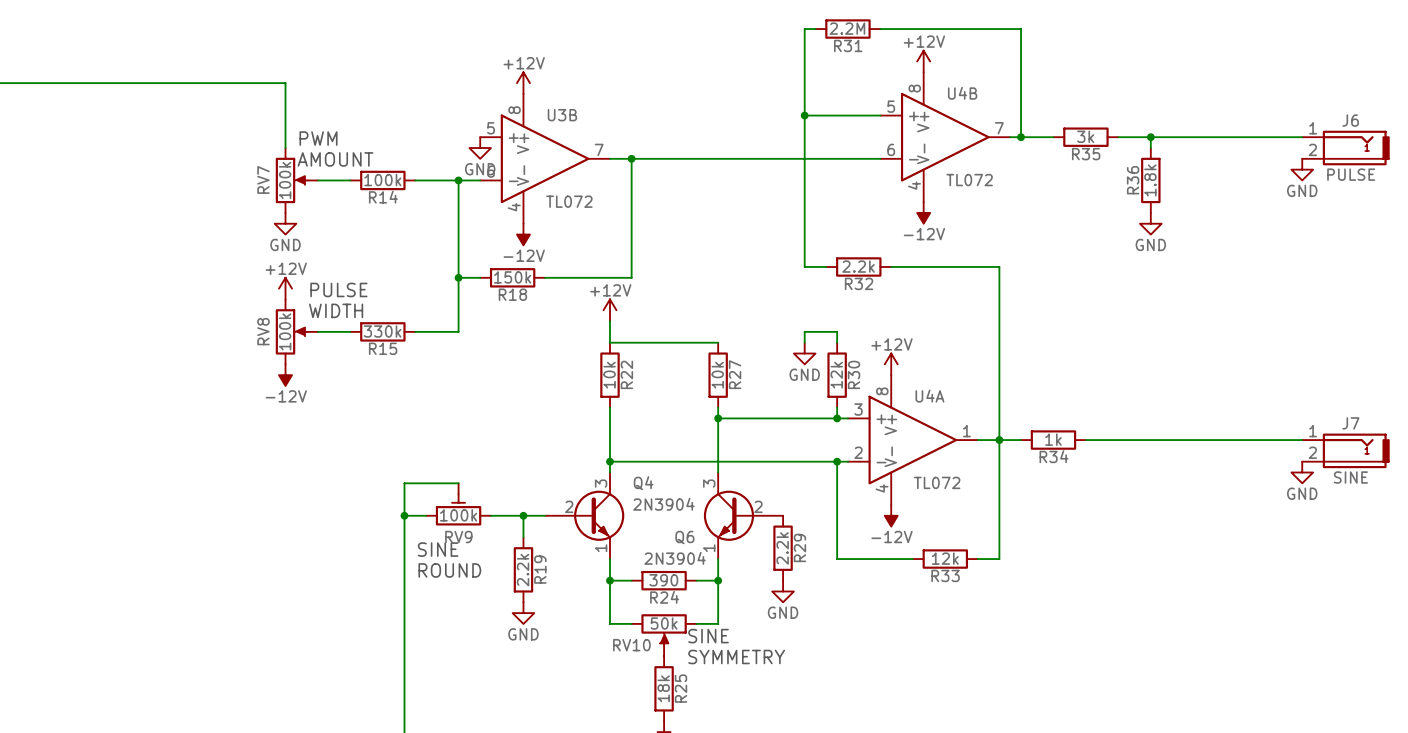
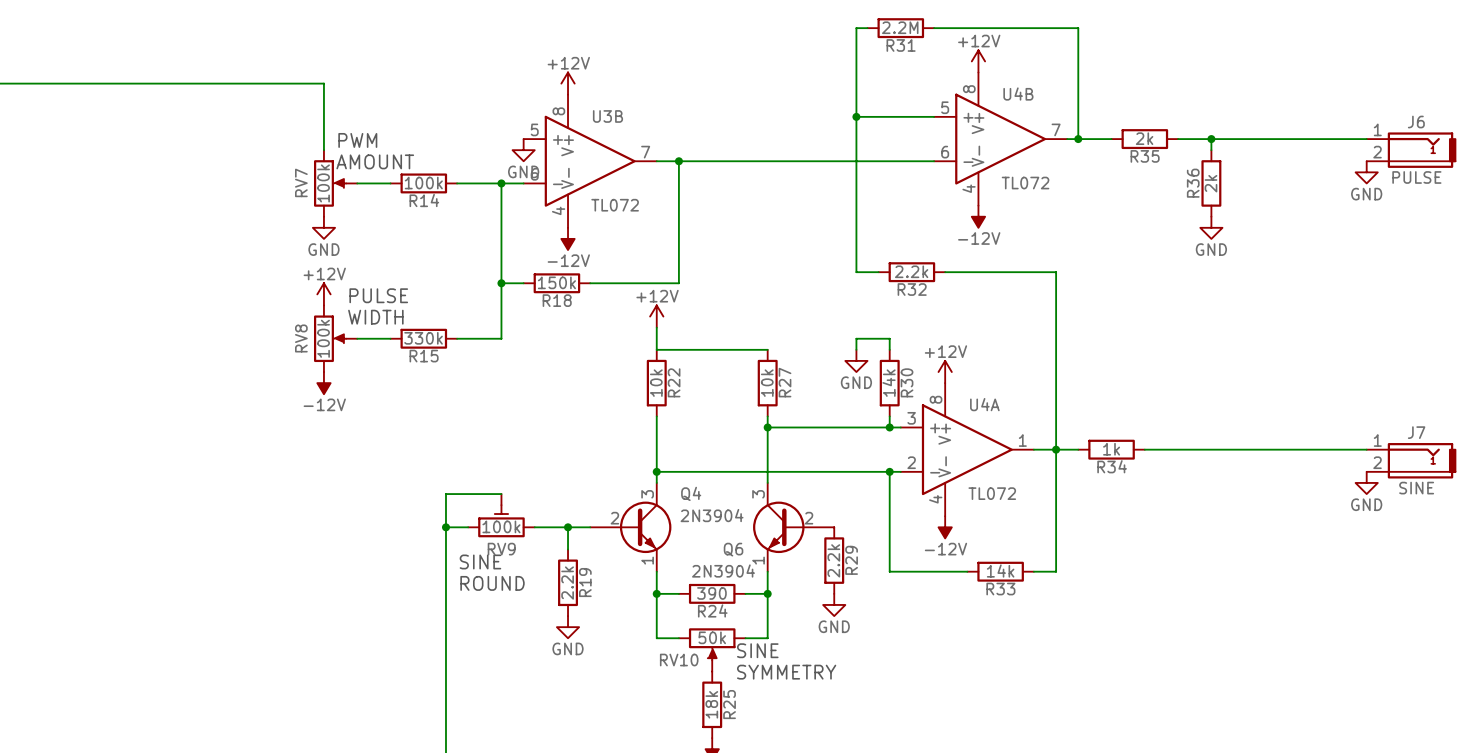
R35 value: 3k (1085, 136) -> 2k (1144, 138)
R36 value: 1.8k (1150, 180) -> 2k (1210, 183)
R30 value: 12k (836, 375) -> 14k (889, 383)
R33 value: 12k (945, 558) -> 14k (1000, 571)

